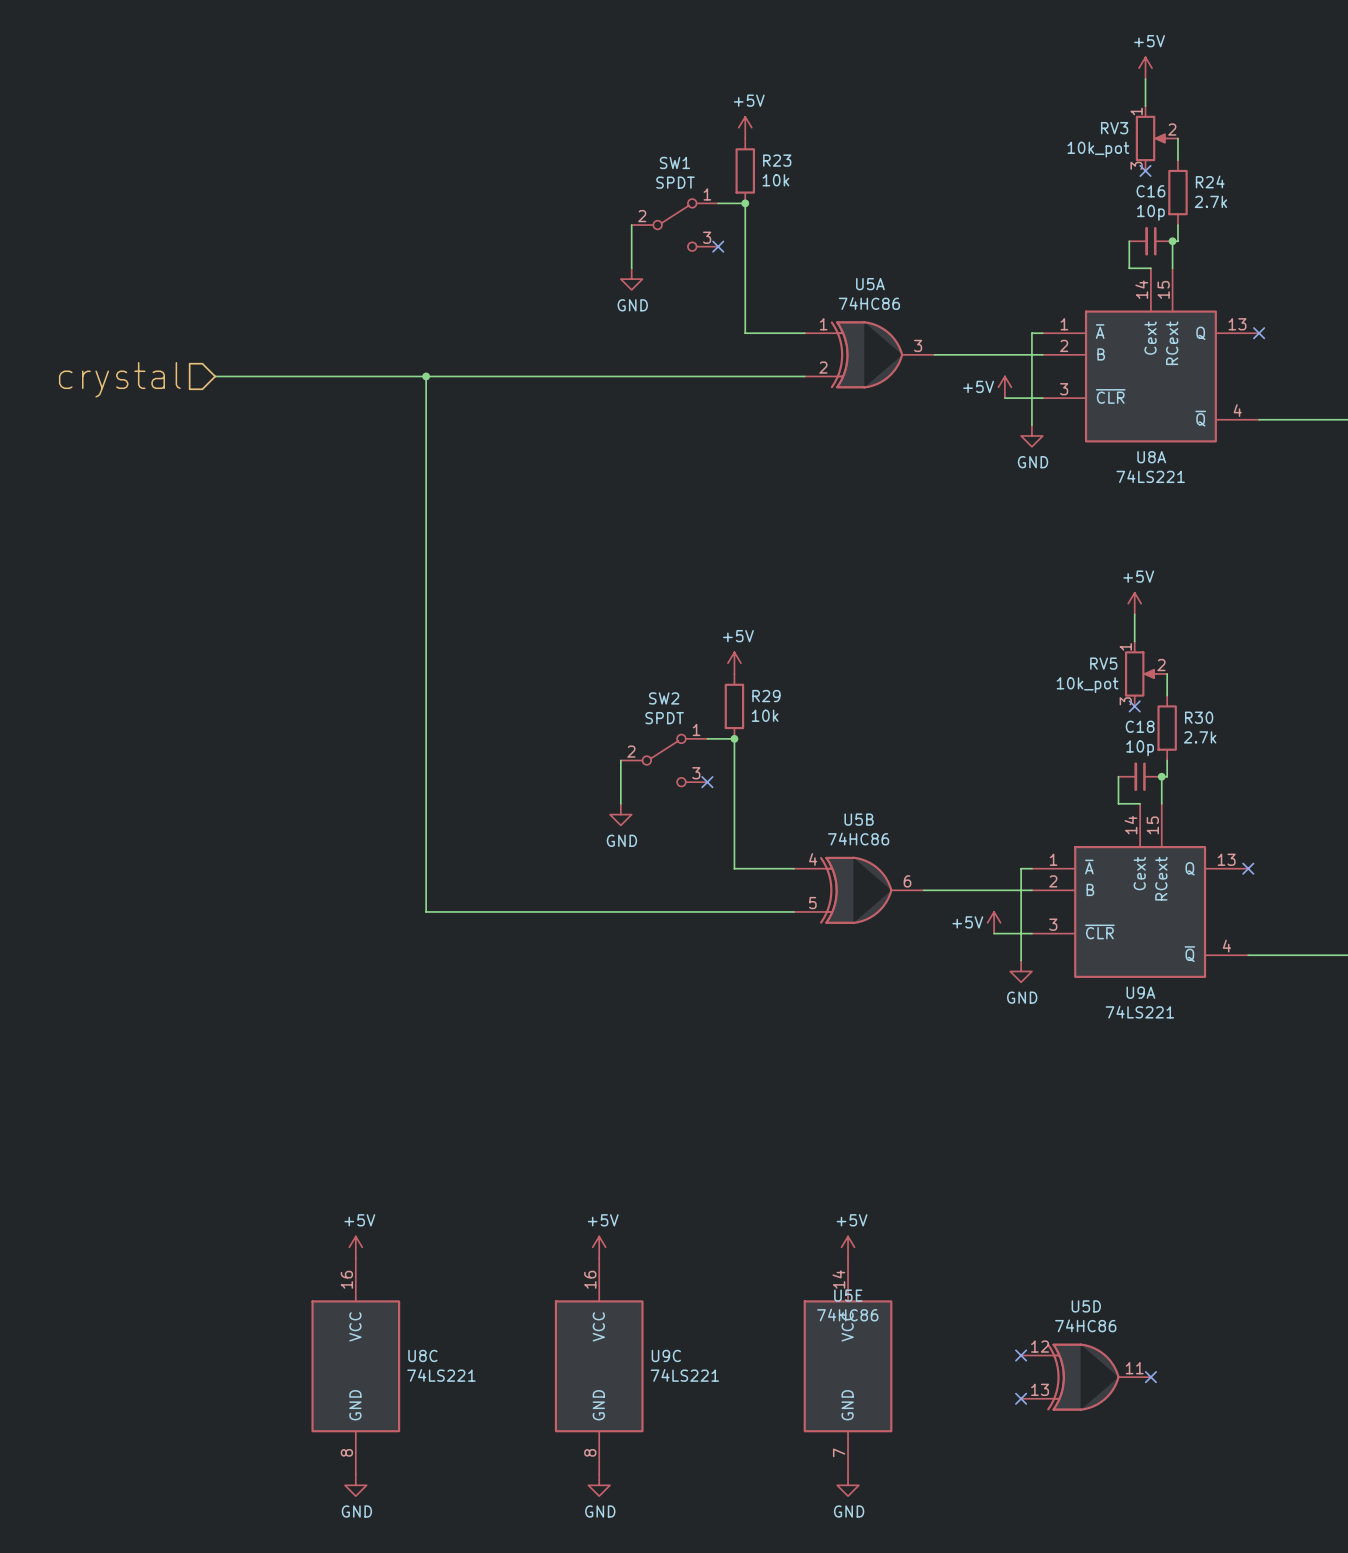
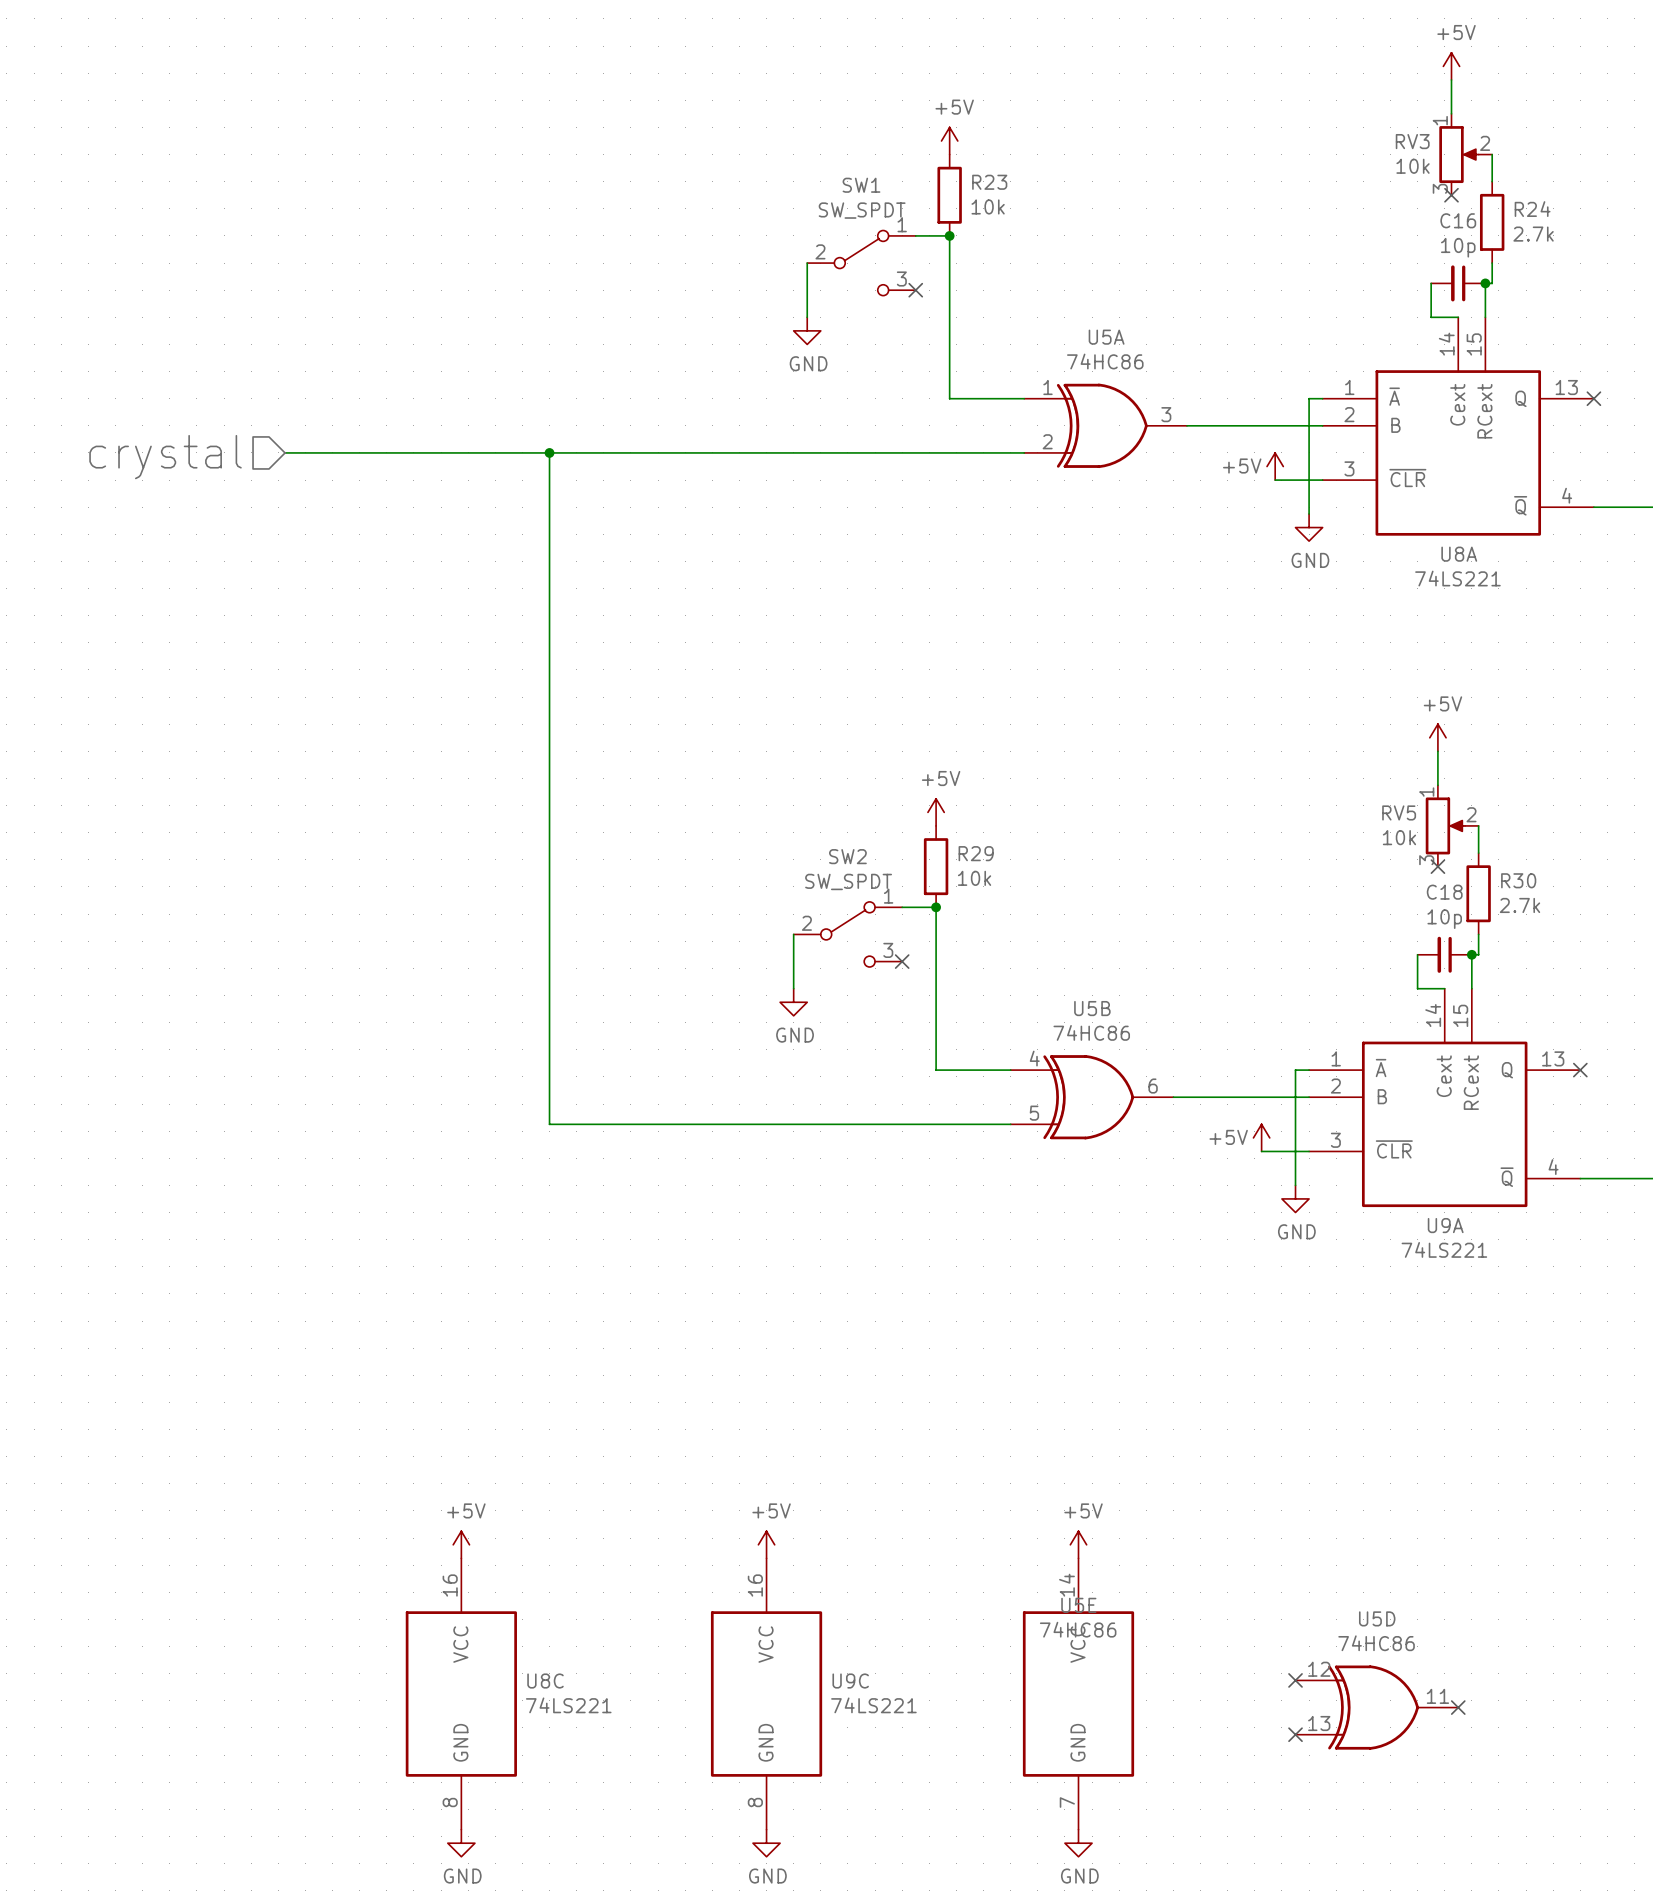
RV3 value: 10k_pot (1098, 149) -> 10k (1413, 166)
SW1 value: SPDT (675, 182) -> SW_SPDT (862, 210)
RV5 value: 10k_pot (1087, 685) -> 10k (1399, 837)
SW2 value: SPDT (664, 718) -> SW_SPDT (848, 881)

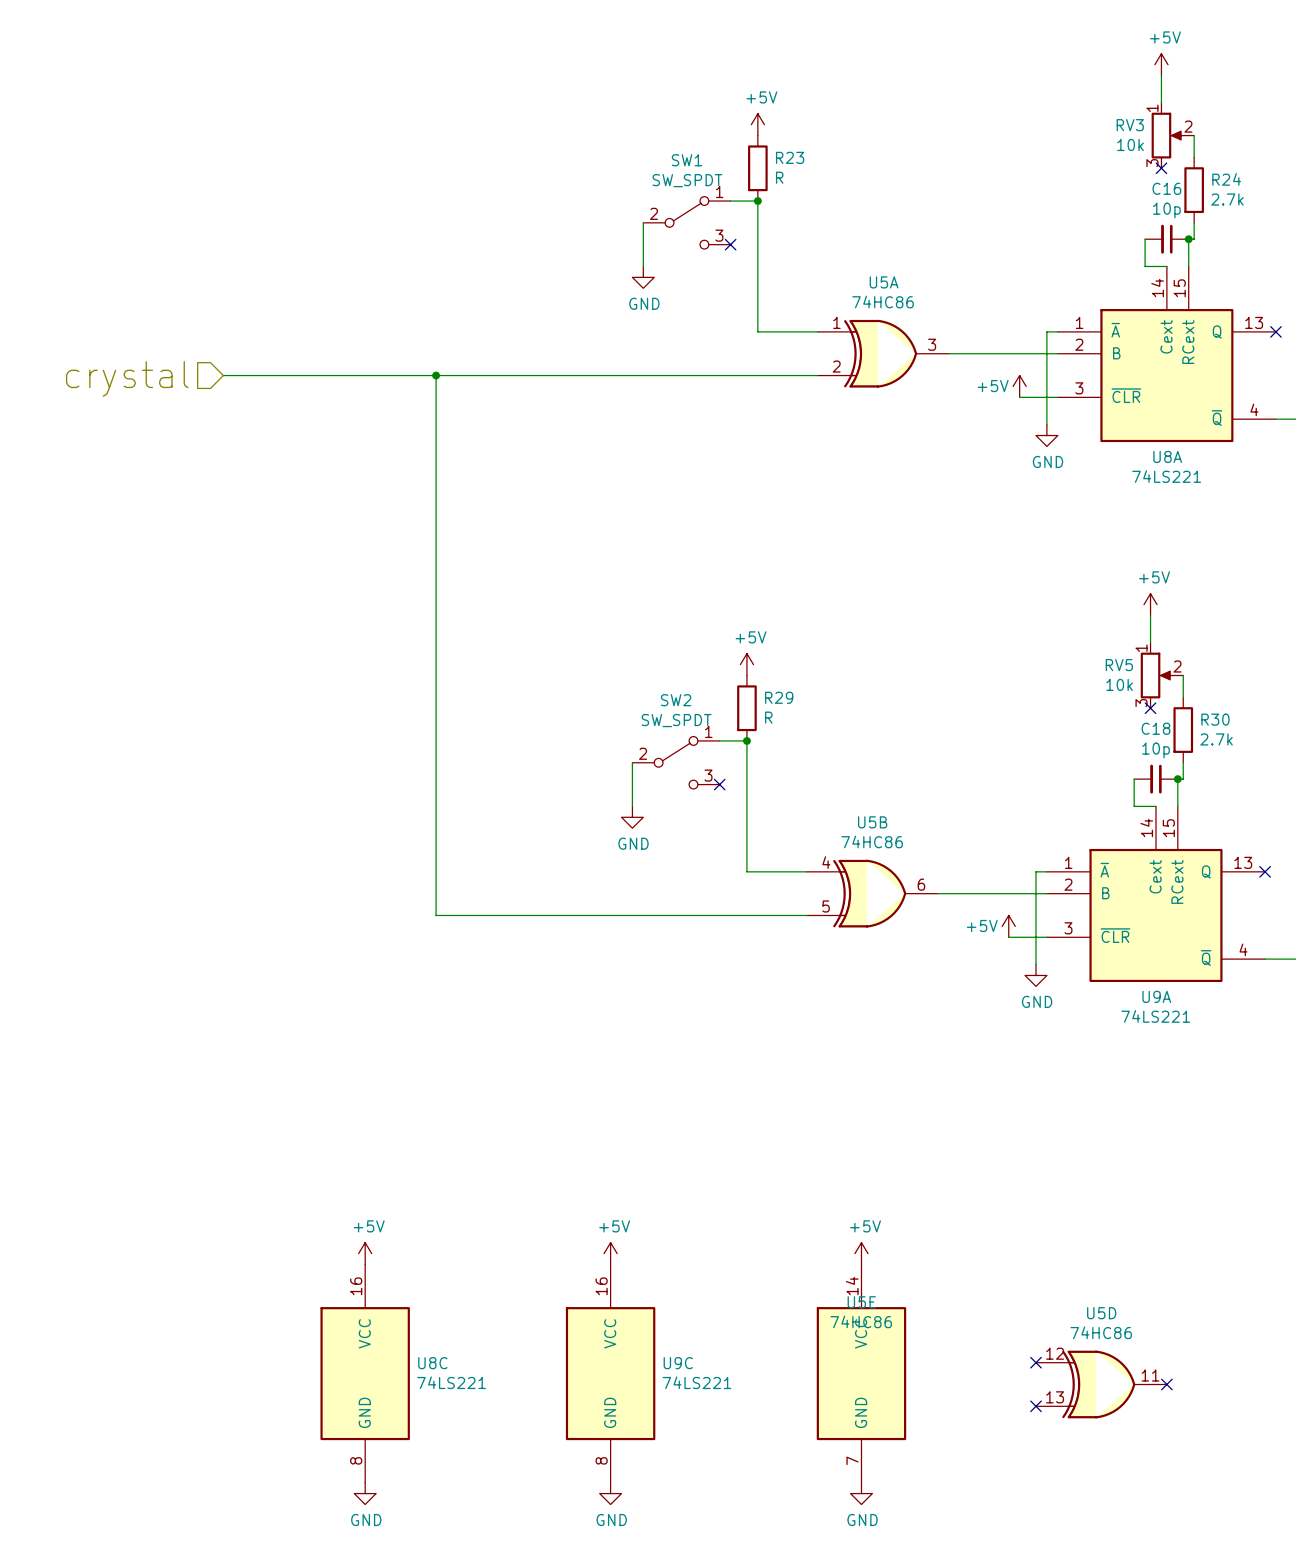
R23 value: 10k (988, 206) -> R (779, 177)
R29 value: 10k (974, 878) -> R (768, 717)

